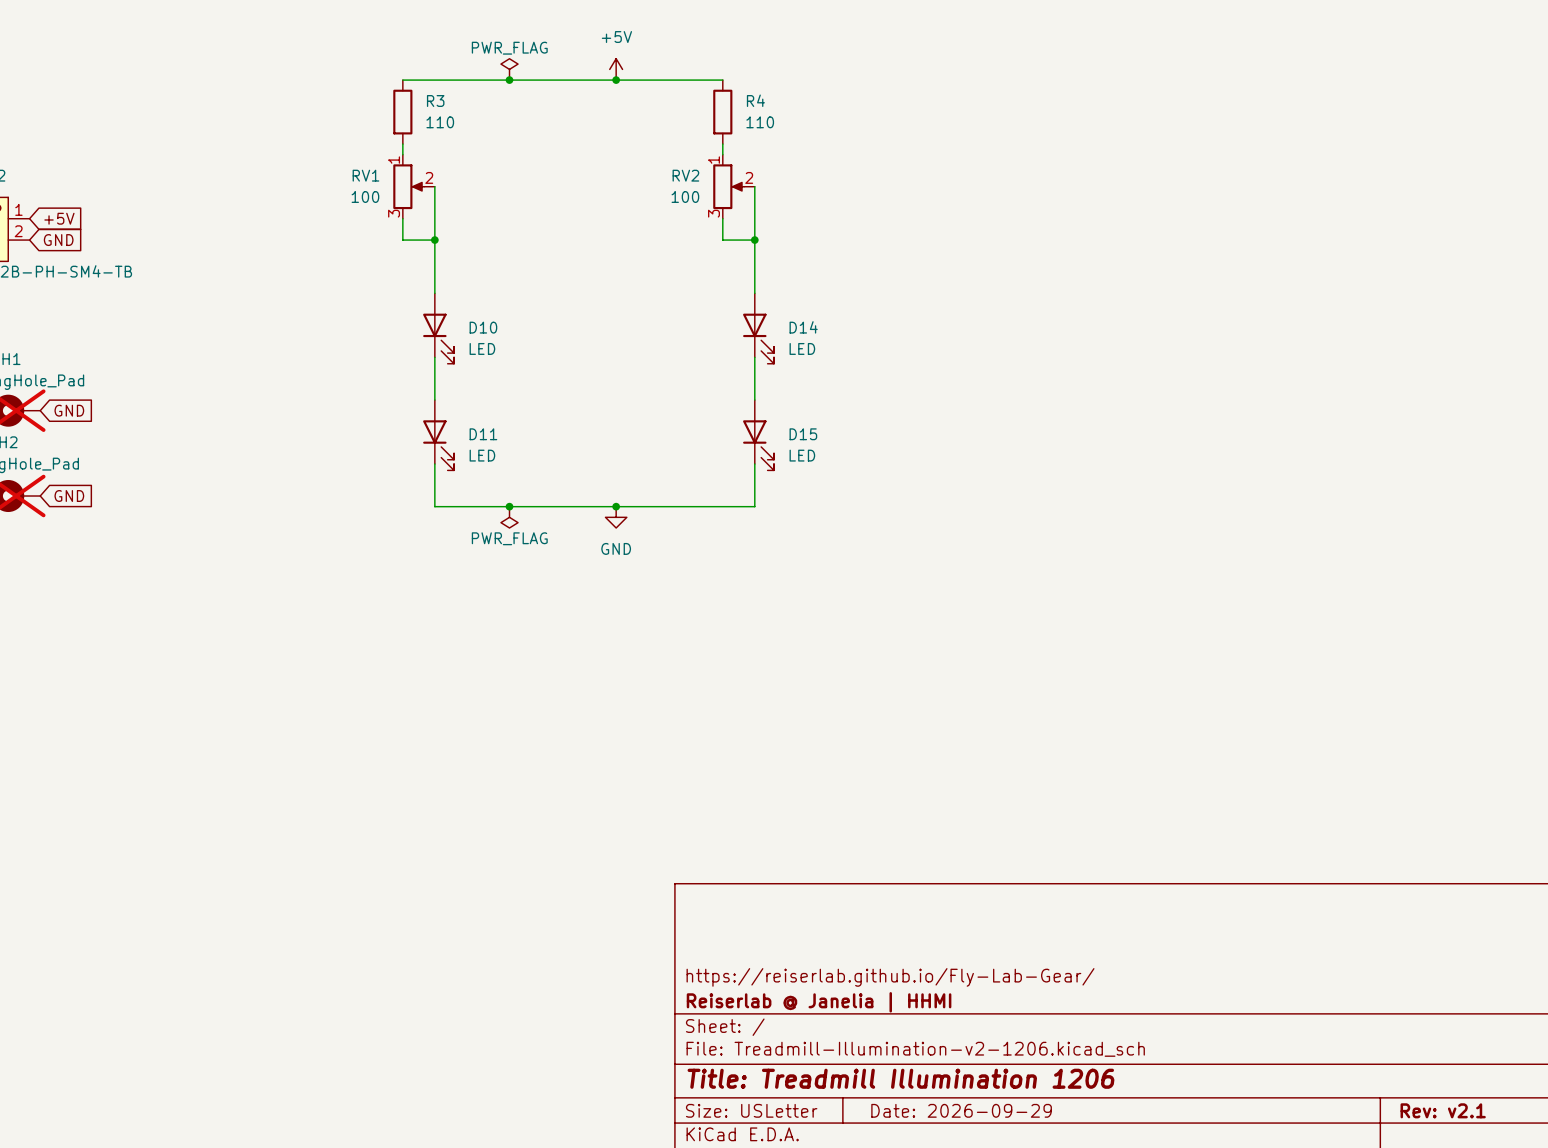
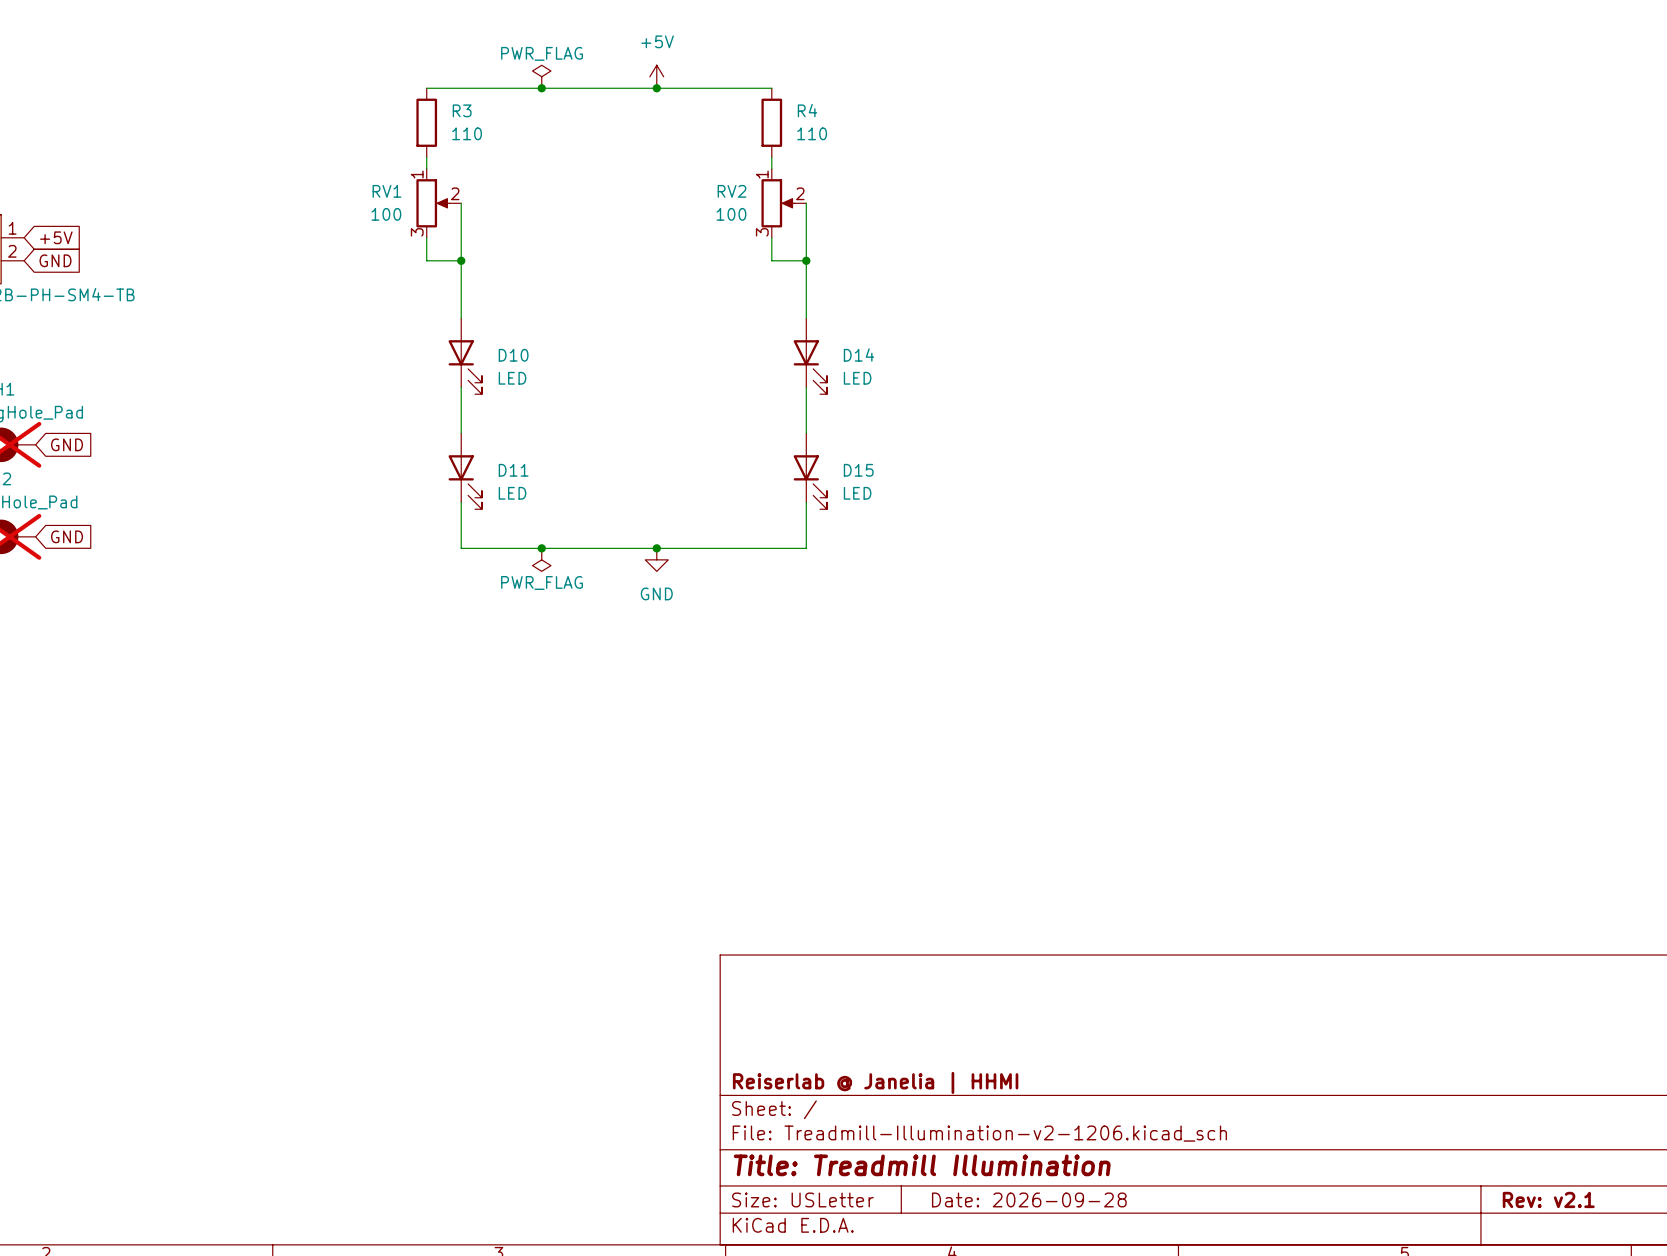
title block: https://reiserlab.github.io/Fly-Lab-Gear/ (890, 977) -> none
title block: Title: Treadmill Illumination 1206 (900, 1078) -> Title: Treadmill Illumination (922, 1165)
title block: Date: 2026-09-29 (961, 1110) -> Date: 2026-09-28 (1029, 1199)

